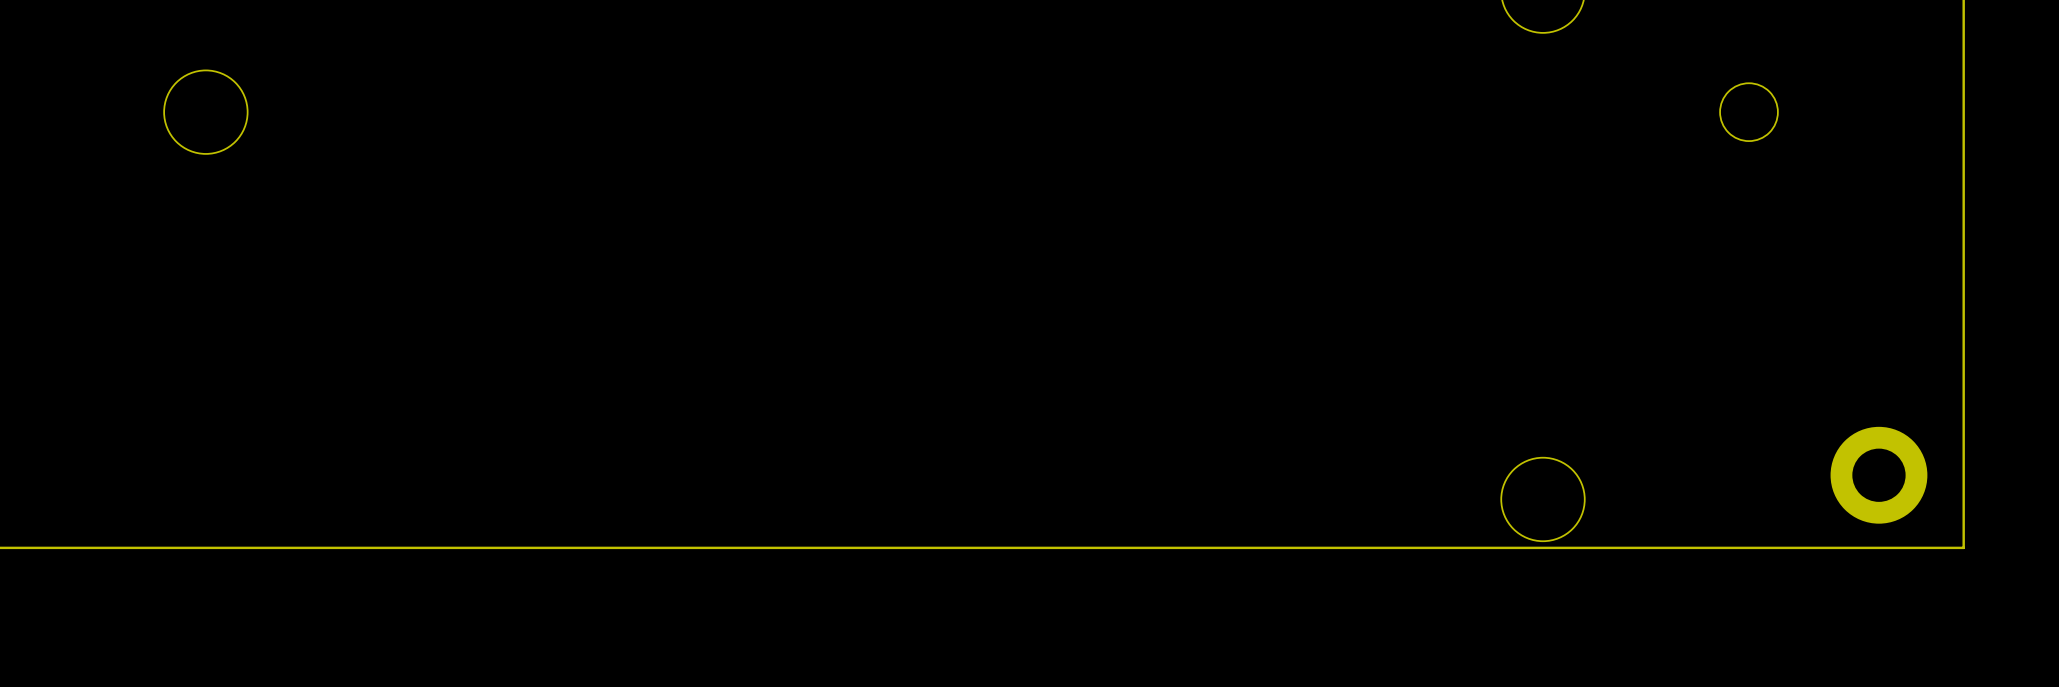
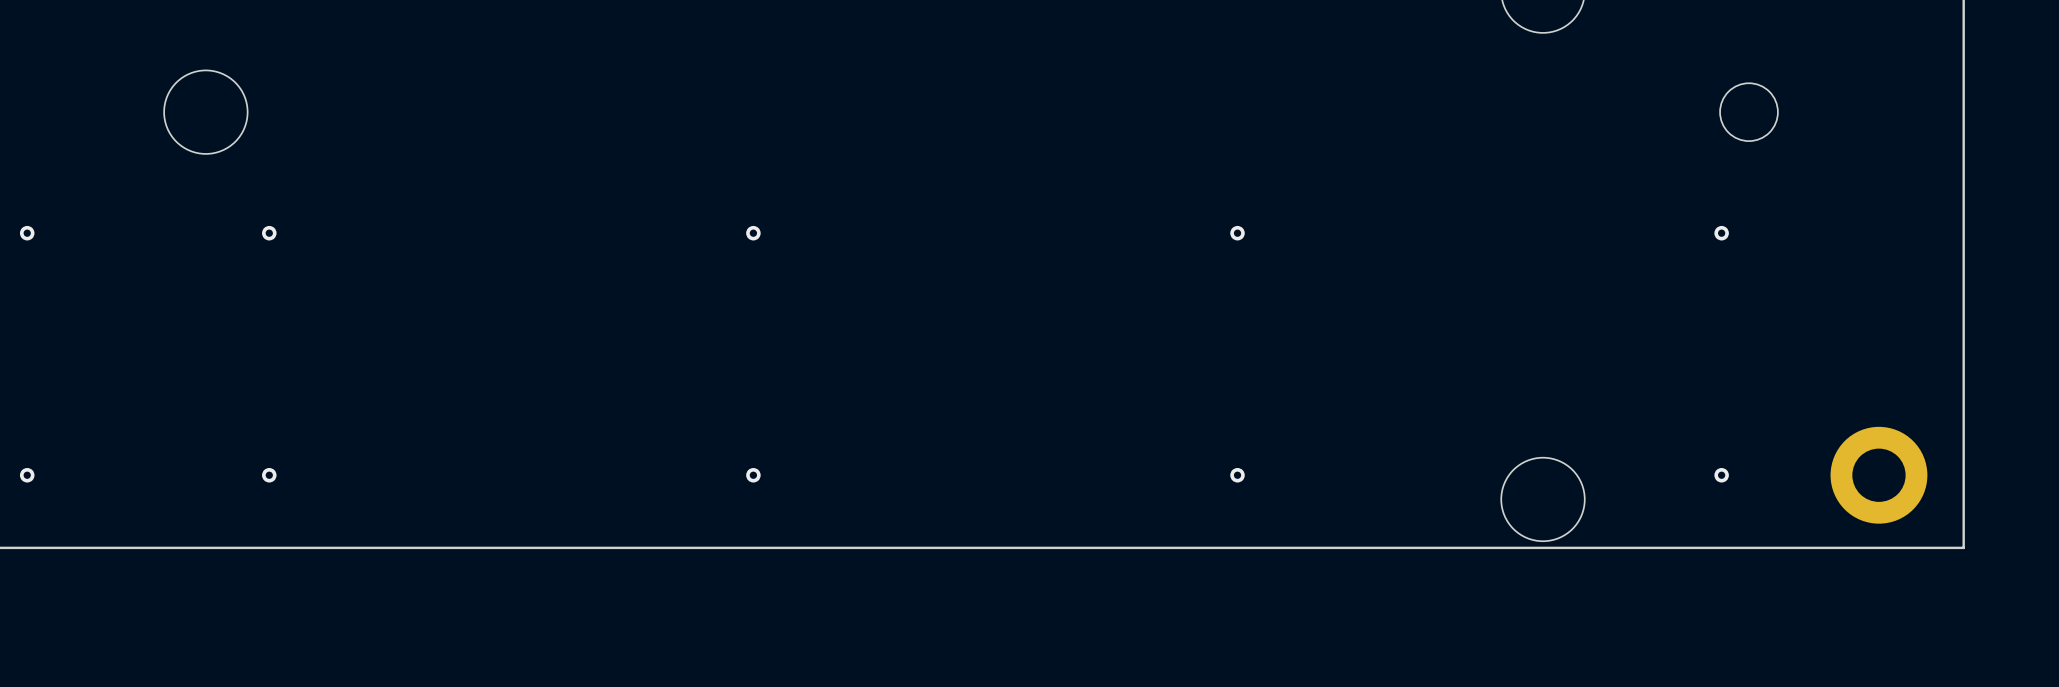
via: none -> (27, 233)
via: none -> (269, 233)
via: none -> (753, 233)
via: none -> (1237, 233)
via: none -> (1721, 233)
via: none -> (27, 475)
via: none -> (269, 475)
via: none -> (753, 475)
via: none -> (1237, 475)
via: none -> (1721, 475)

